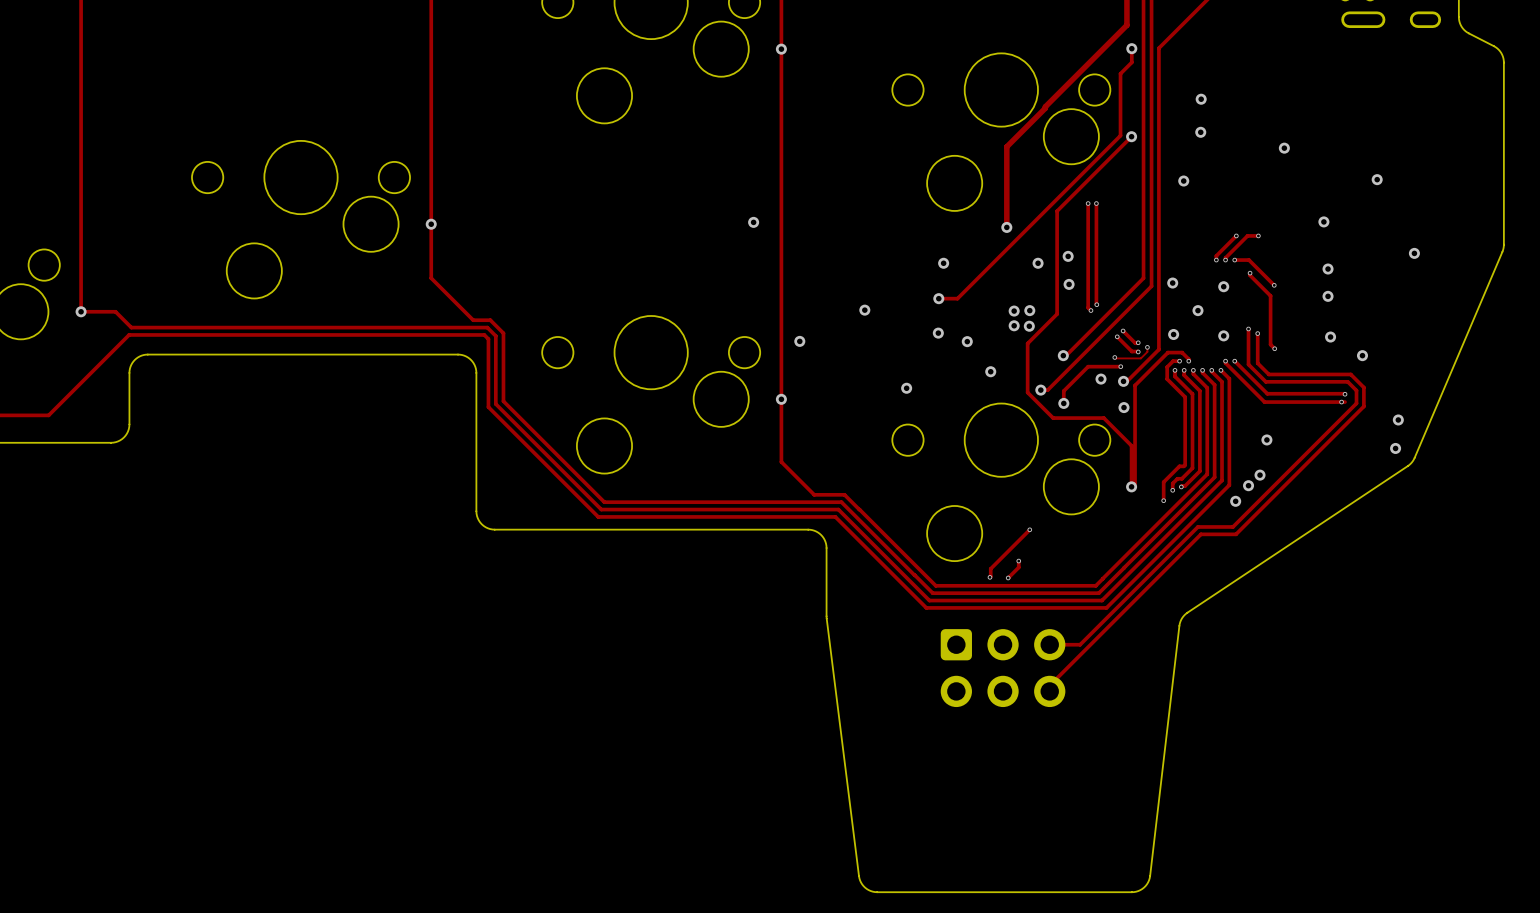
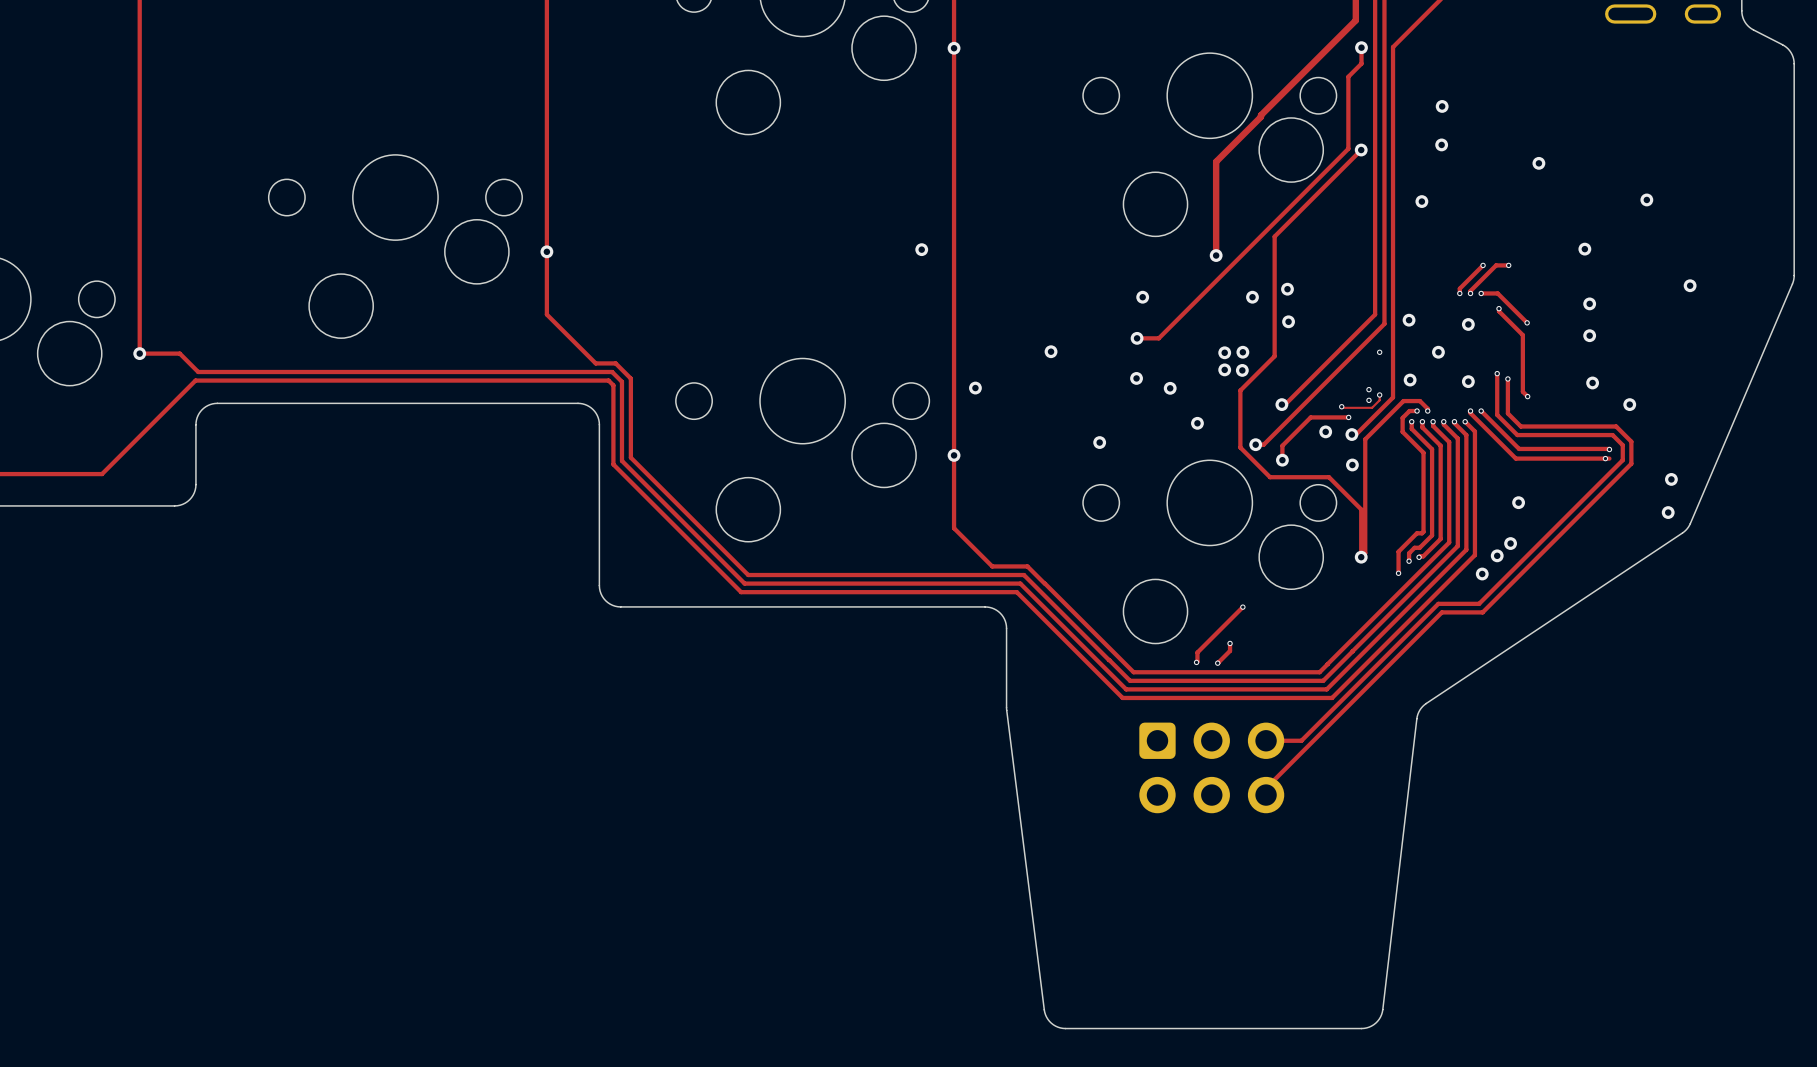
track: (1088, 203) (1088, 307) (1090, 310) -> none
via: (1088, 203) -> none
track: (1096, 203) (1096, 304) -> none
via: (1096, 203) -> none
via: (1096, 304) -> none
via: (1090, 310) -> none
via: none -> (1379, 352)
track: (1123, 330) (1135, 343) (1138, 342) -> none
via: (1123, 330) -> none
track: (1117, 336) (1131, 351) (1138, 351) -> none
via: (1117, 336) -> none

